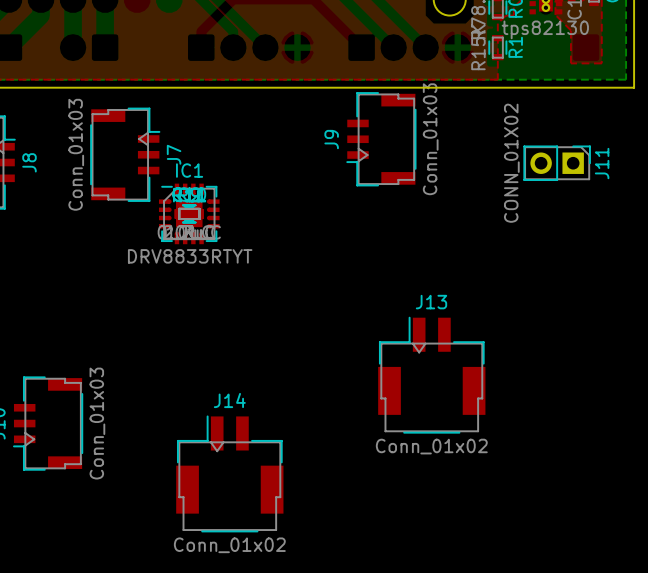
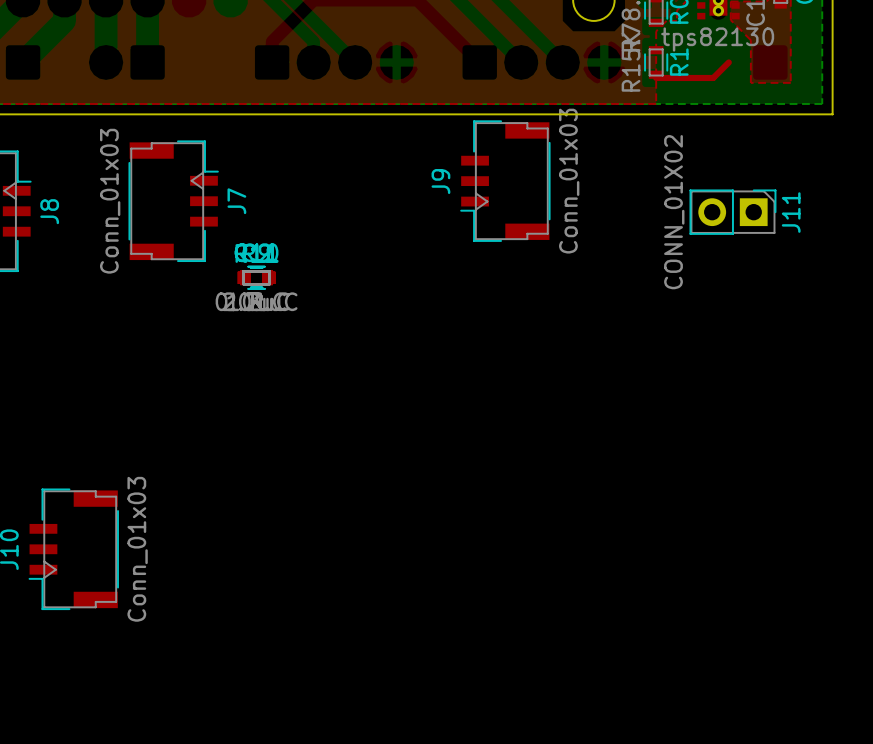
top track: none -> (728, 62) (713, 77) (656, 77)
IC1: DRV8833RTYT (189, 213) -> none
J13: Conn_01x02 (431, 375) -> none
J14: Conn_01x02 (229, 473) -> none

